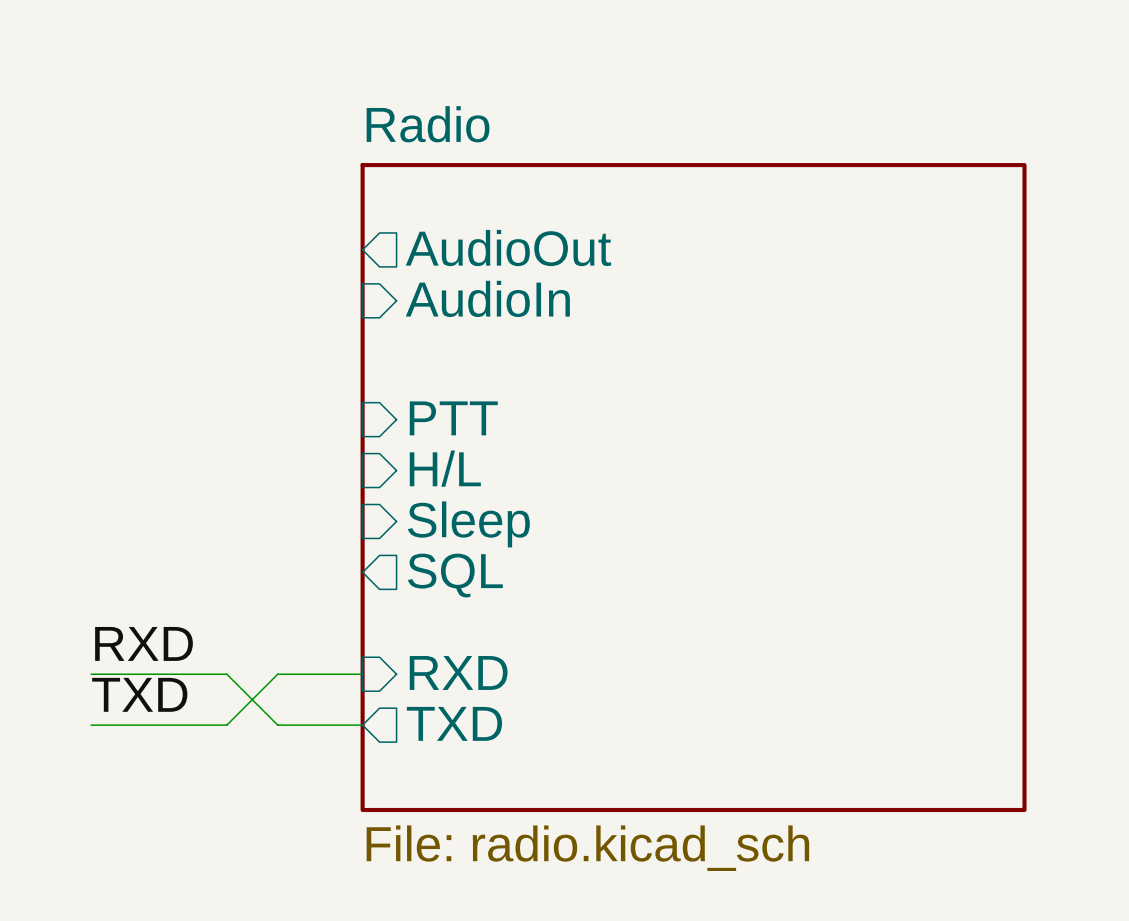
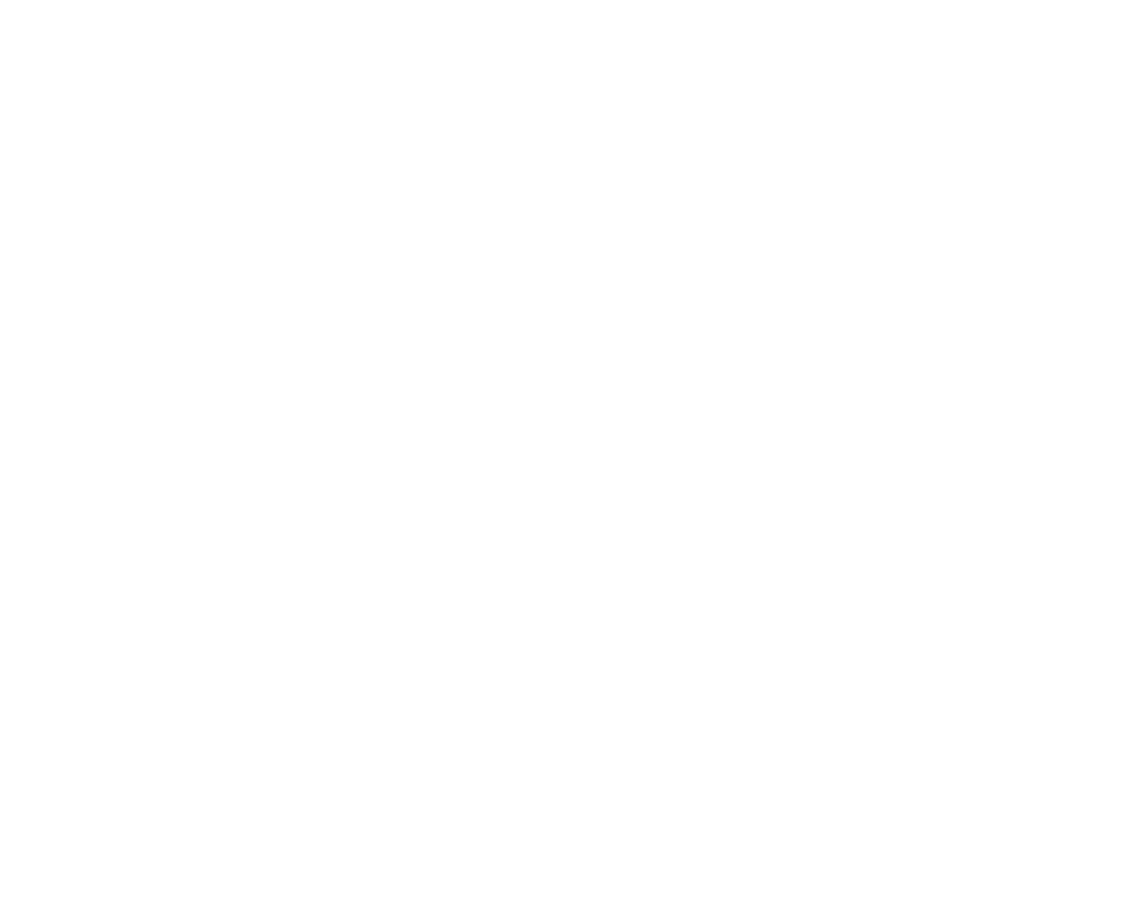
sheet pin: AudioOut (508, 248) -> none
sheet pin: AudioIn (487, 298) -> none
sheet pin: PTT (453, 418) -> none
sheet pin: H/L (445, 468) -> none
sheet Radio: File: radio.kicad_sch (693, 487) -> none
sheet pin: Sleep (468, 524) -> none
sheet pin: SQL (455, 575) -> none
label: RXD (144, 643) -> none
sheet pin: RXD (458, 672) -> none
wire: (91, 674) (226, 674) (277, 725) (362, 725) -> none
wire: (362, 674) (277, 674) (226, 725) (91, 725) -> none
label: TXD (139, 694) -> none
sheet pin: TXD (454, 723) -> none

